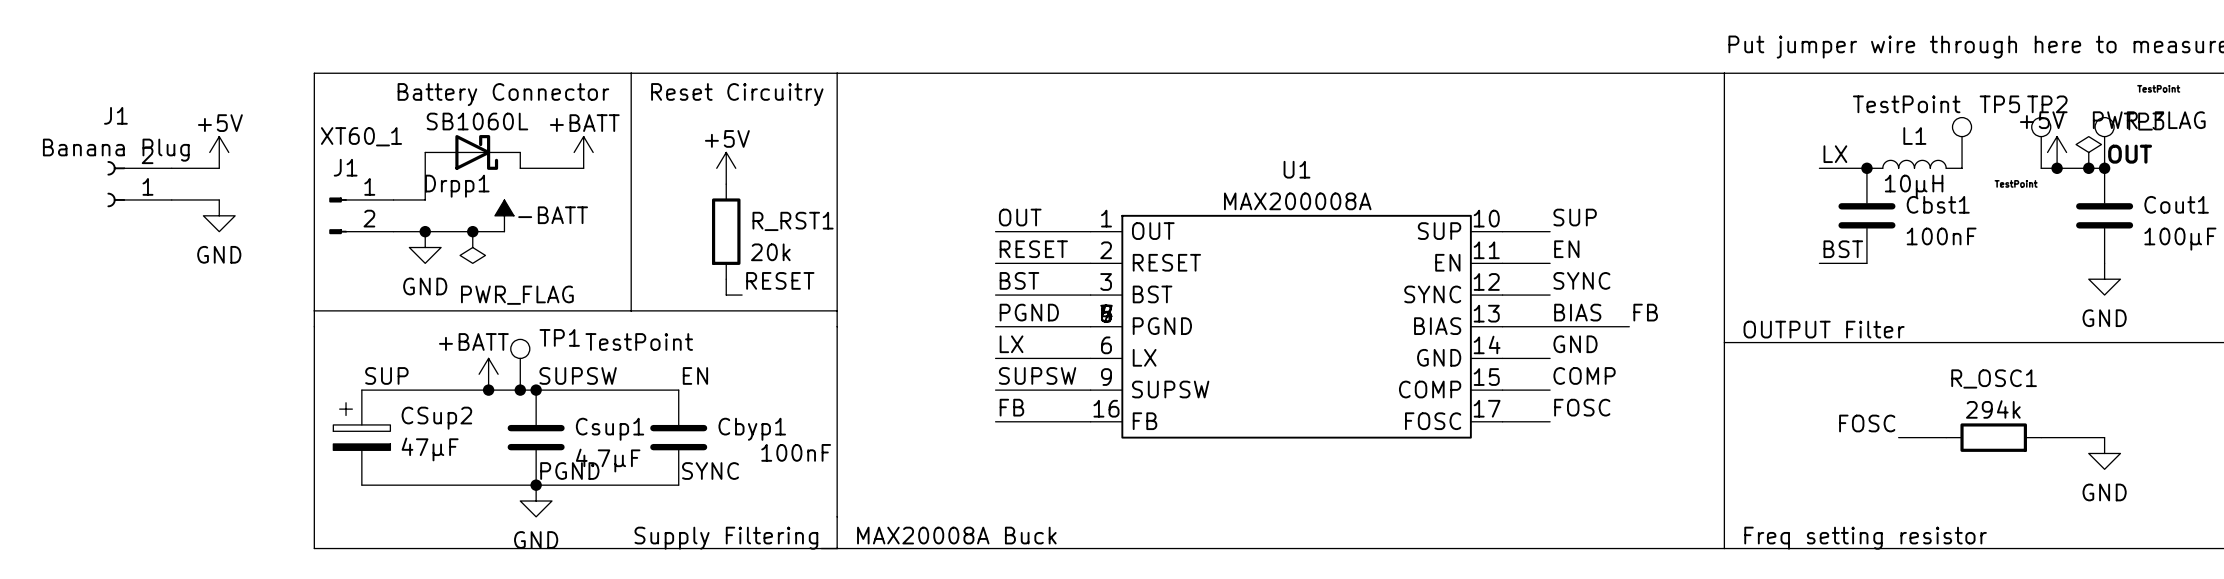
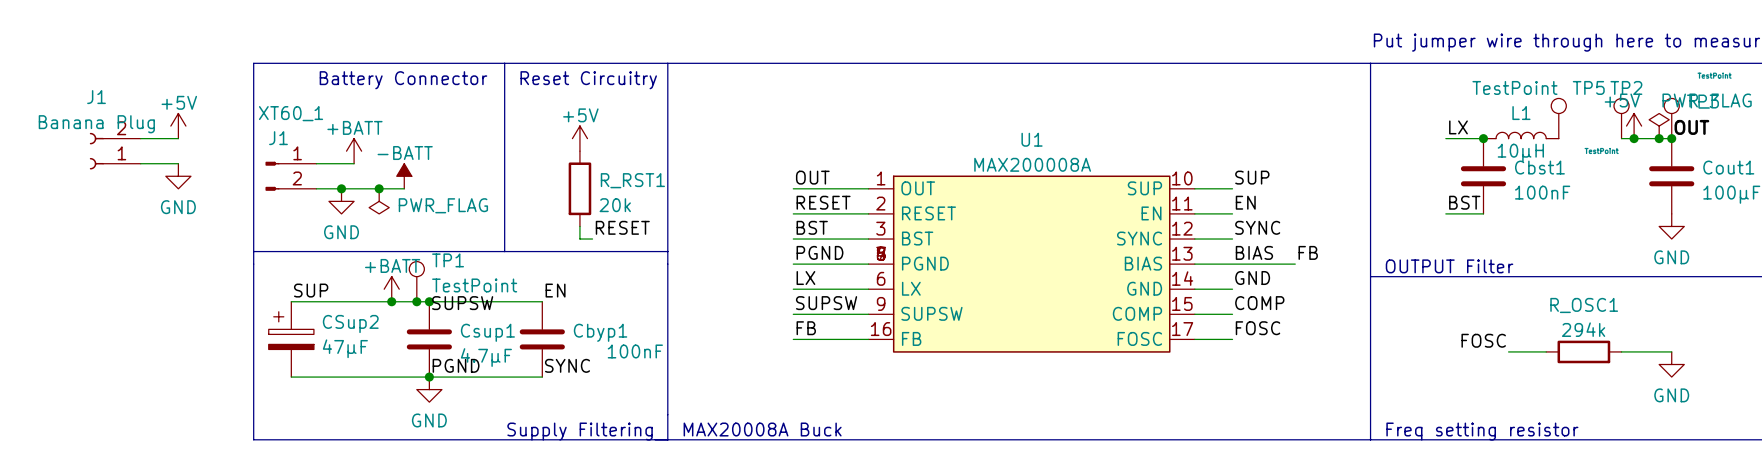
wire: (425, 152) (425, 199) -> (354, 163) (341, 163)
Drpp1: SB1060L (472, 152) -> none
wire: (520, 152) (520, 168) (583, 168) -> none
power symbol: +BATT (583, 152) -> none
power symbol: none -> +BATT (354, 151)
power symbol text position: -BATT (553, 215) -> -BATT (405, 153)
power symbol text position: PWR_FLAG (517, 295) -> PWR_FLAG (443, 205)
power symbol text position: +BATT (473, 341) -> +BATT (392, 265)
TP1 value position: TestPoint (639, 341) -> TestPoint (474, 285)
TP1 position: (520, 364) -> (416, 281)
power symbol position: +BATT (488, 374) -> +BATT (391, 289)
junction: none -> (416, 301)
junction: none -> (429, 301)
label position: SUP (386, 375) -> SUP (311, 290)
label position: EN (695, 375) -> EN (555, 290)
wire: (361, 390) (678, 390) -> (291, 301) (542, 301)
junction position: (488, 390) -> (391, 301)
junction: (520, 390) -> none
junction: (536, 390) -> none
CSup2 position: (361, 437) -> (291, 339)
Csup1 position: (536, 437) -> (429, 339)
Cbyp1 position: (678, 437) -> (542, 339)
label position: PGND (569, 471) -> PGND (456, 365)
label position: SYNC (710, 471) -> SYNC (567, 365)
wire: (361, 485) (678, 485) -> (291, 377) (542, 377)
junction position: (536, 485) -> (429, 377)
power symbol position: GND (536, 501) -> GND (429, 389)

